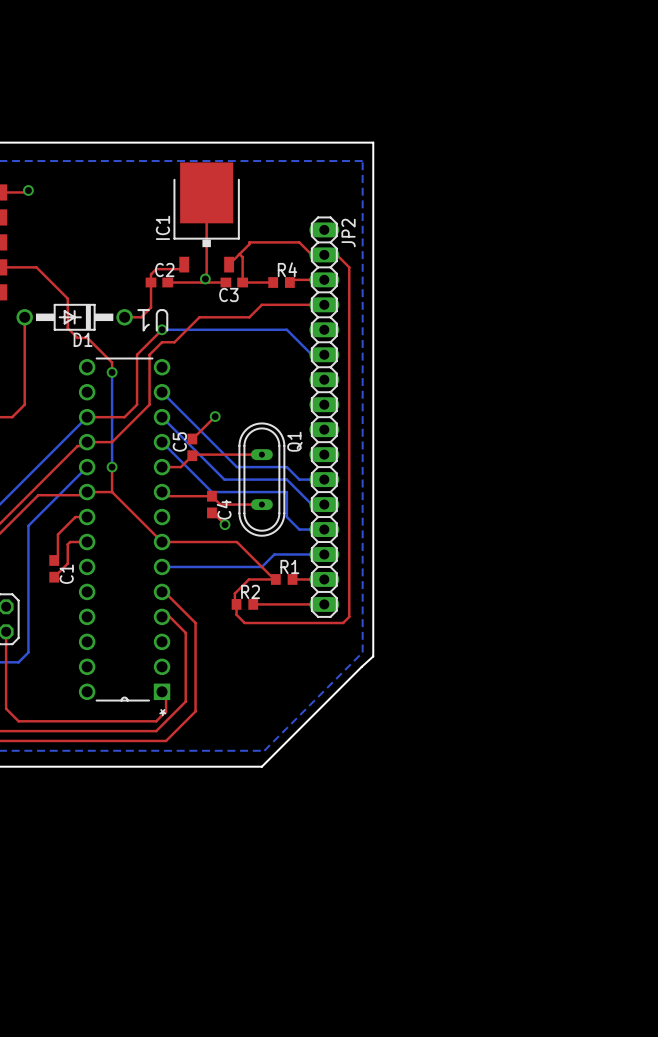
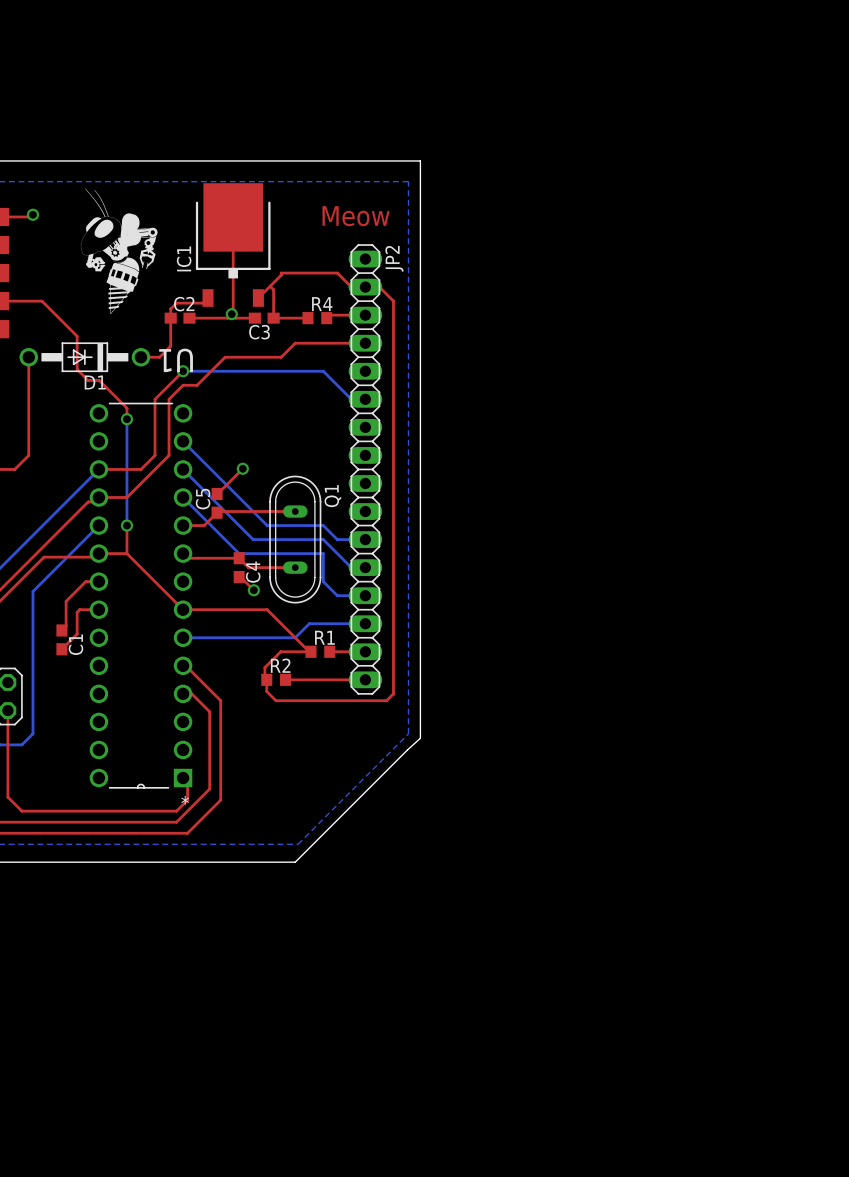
drawing: none -> [80, 188, 158, 315]
text: none -> Meow (356, 216)

